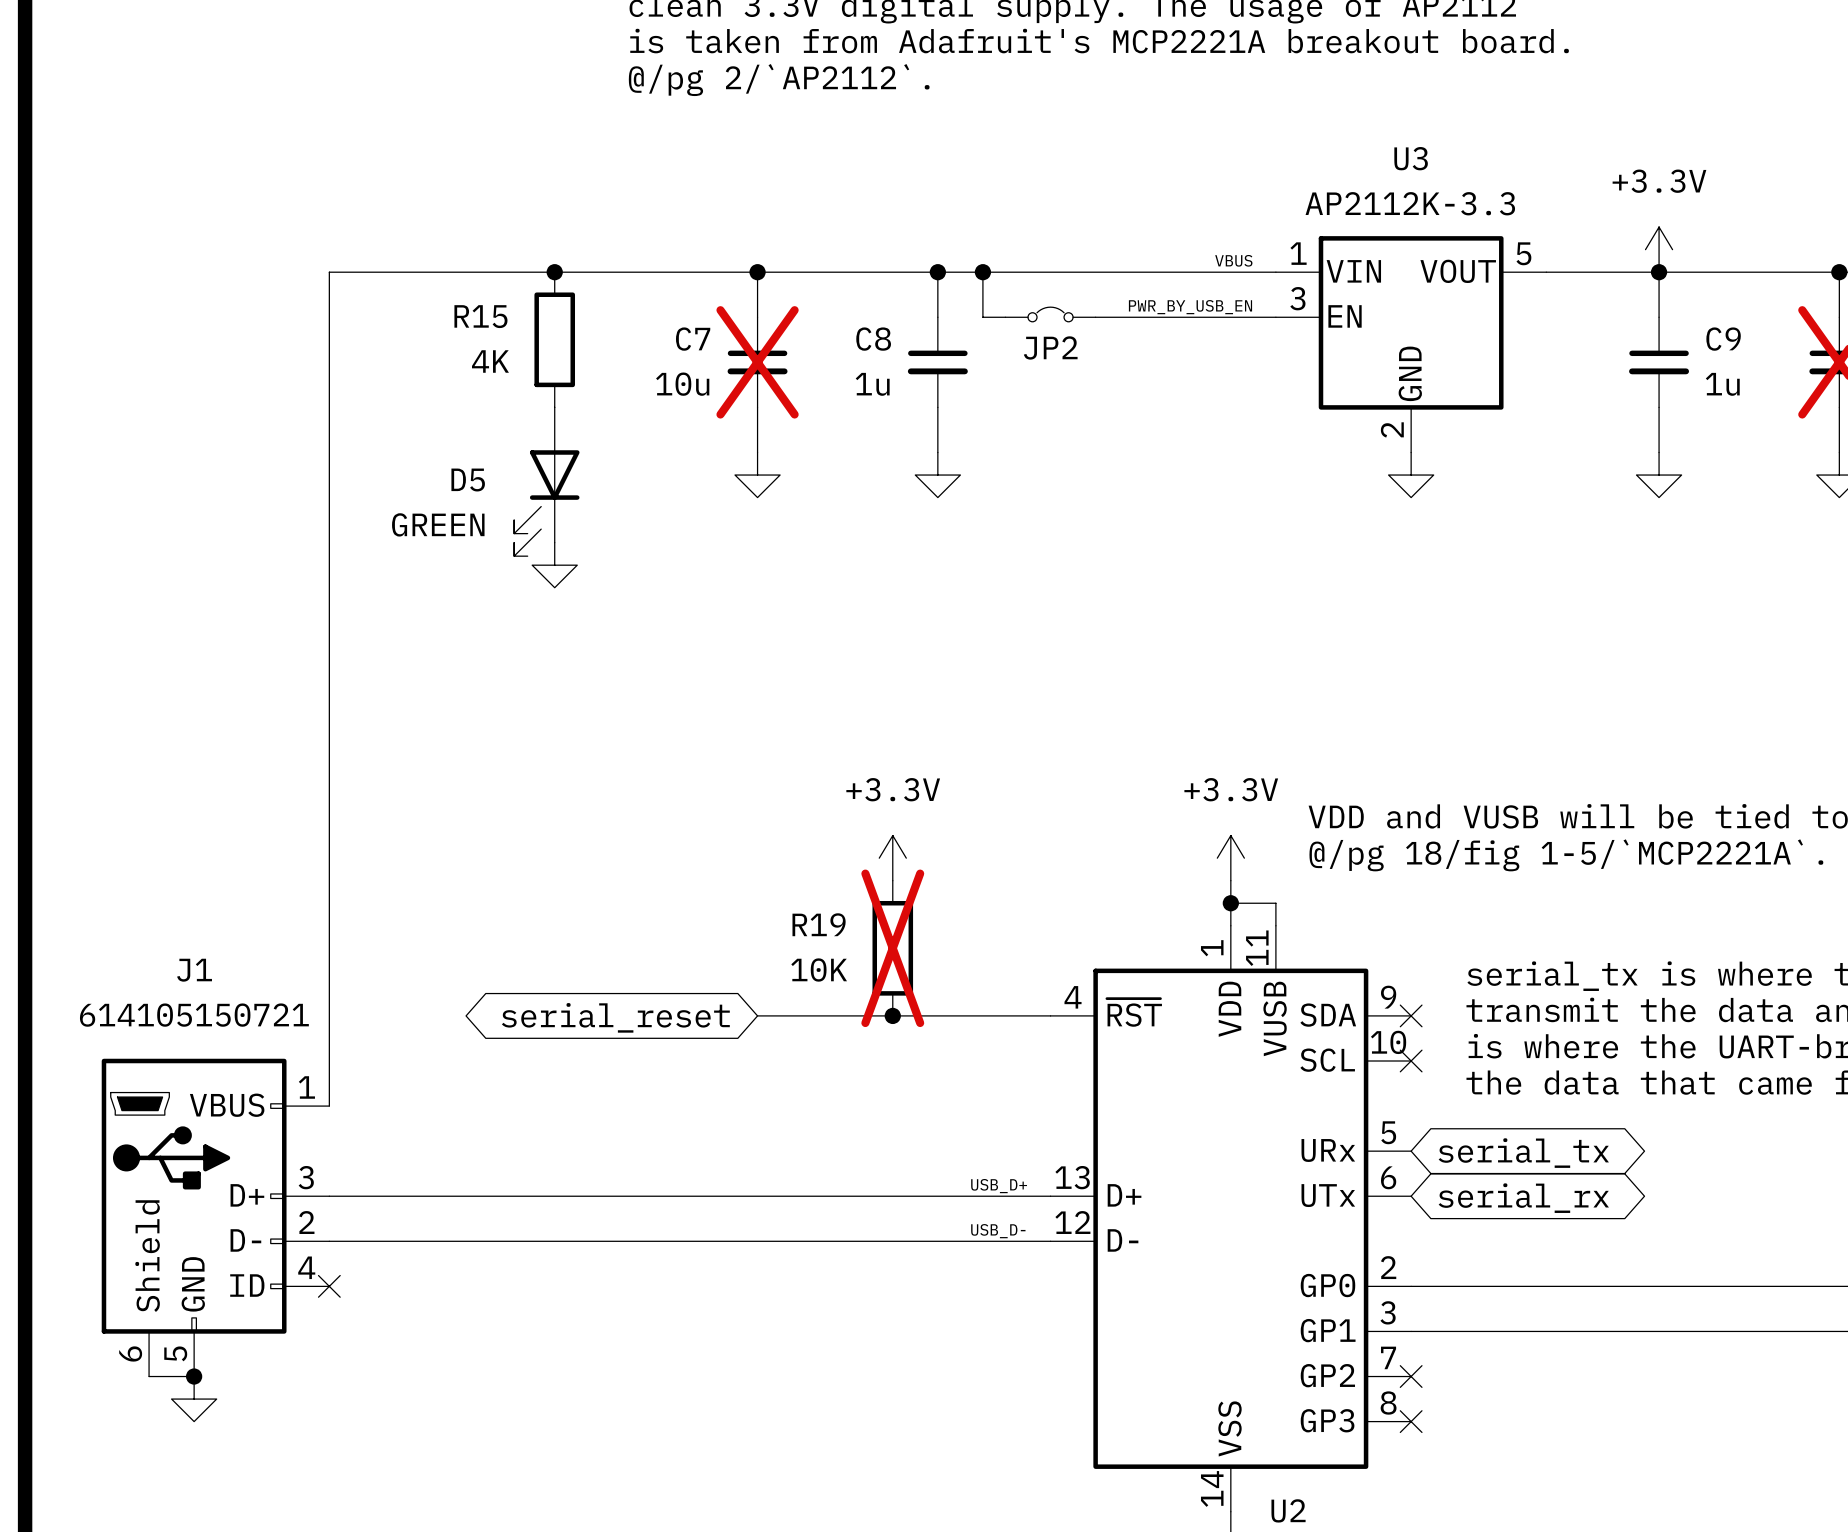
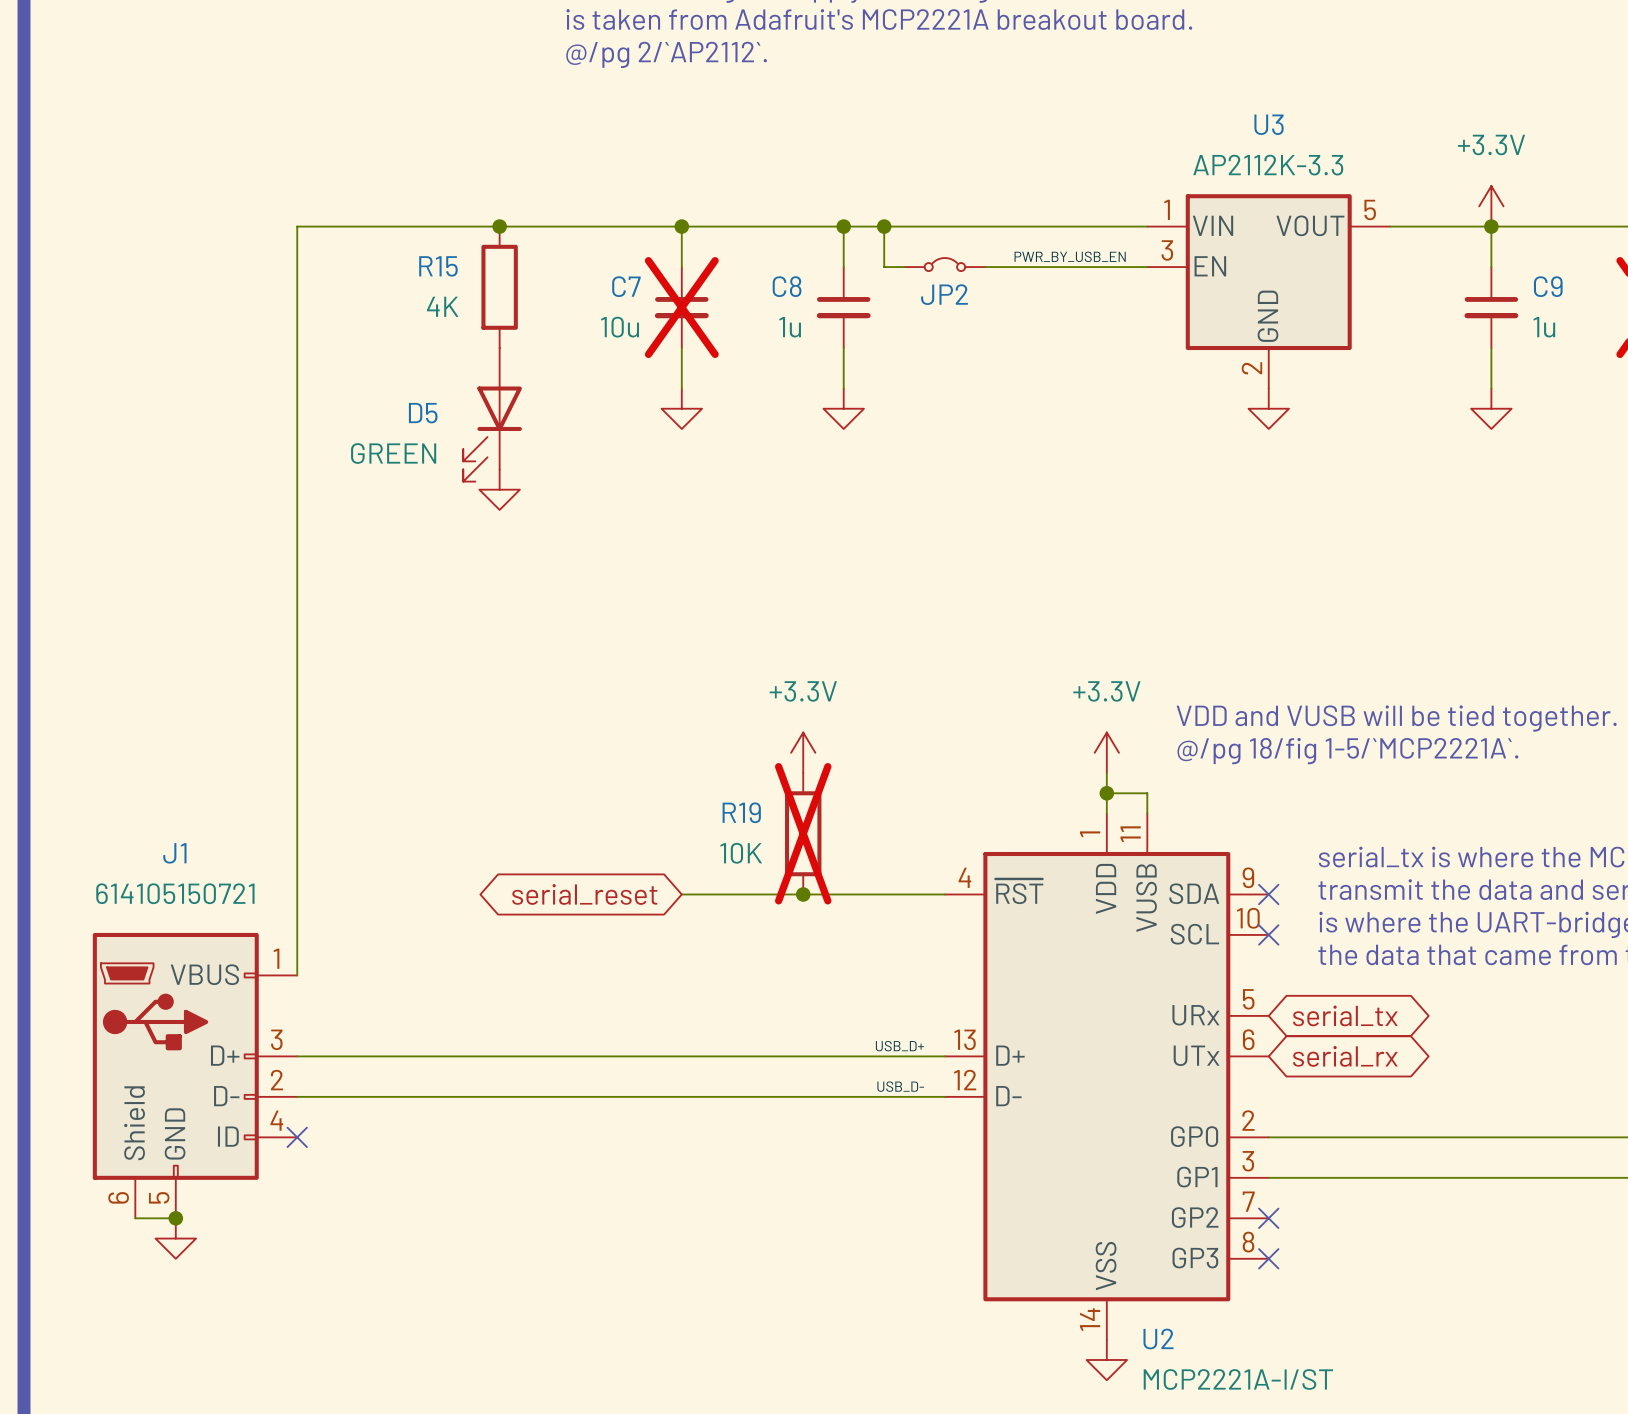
label: VBUS (1233, 260) -> none

